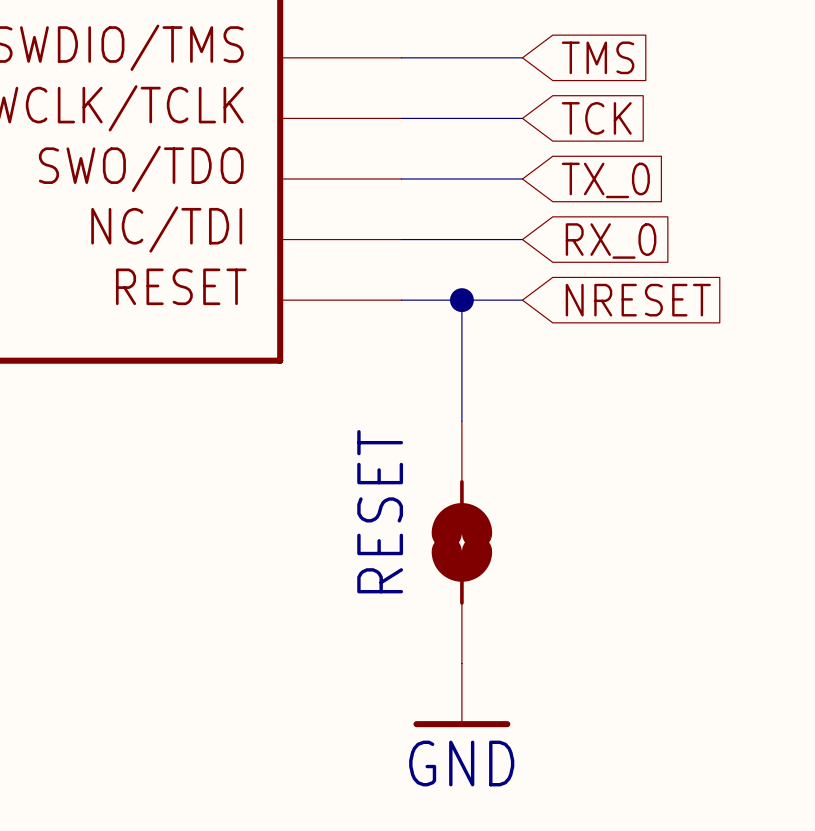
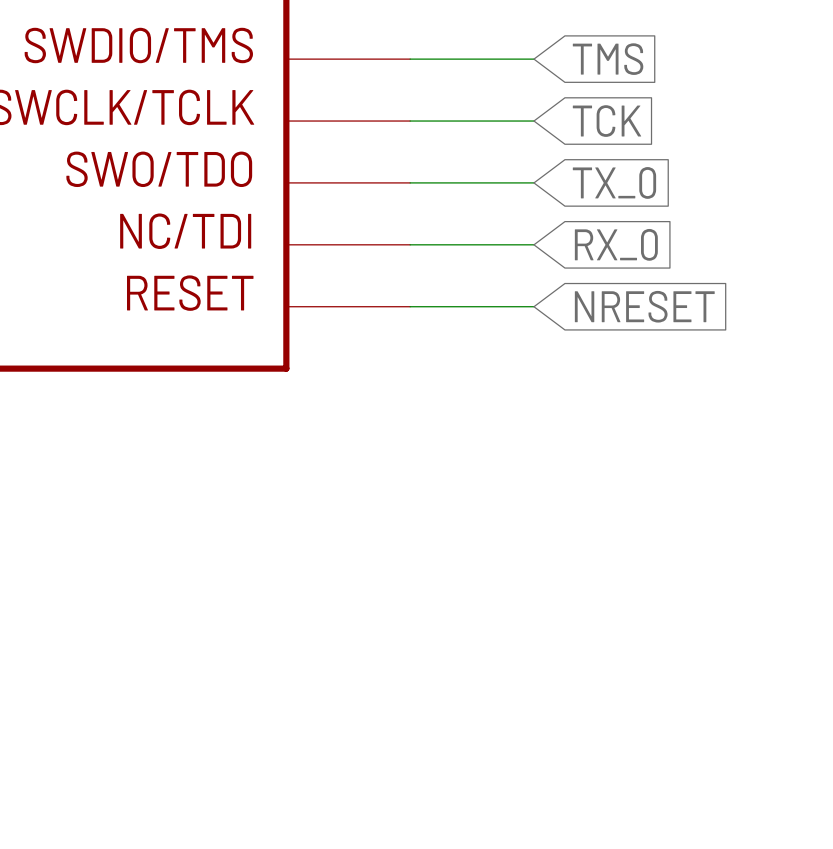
wire: (461, 300) (461, 421) -> none
junction: (461, 300) -> none
RESET: (461, 542) -> none
power symbol: GND (461, 695) -> none

